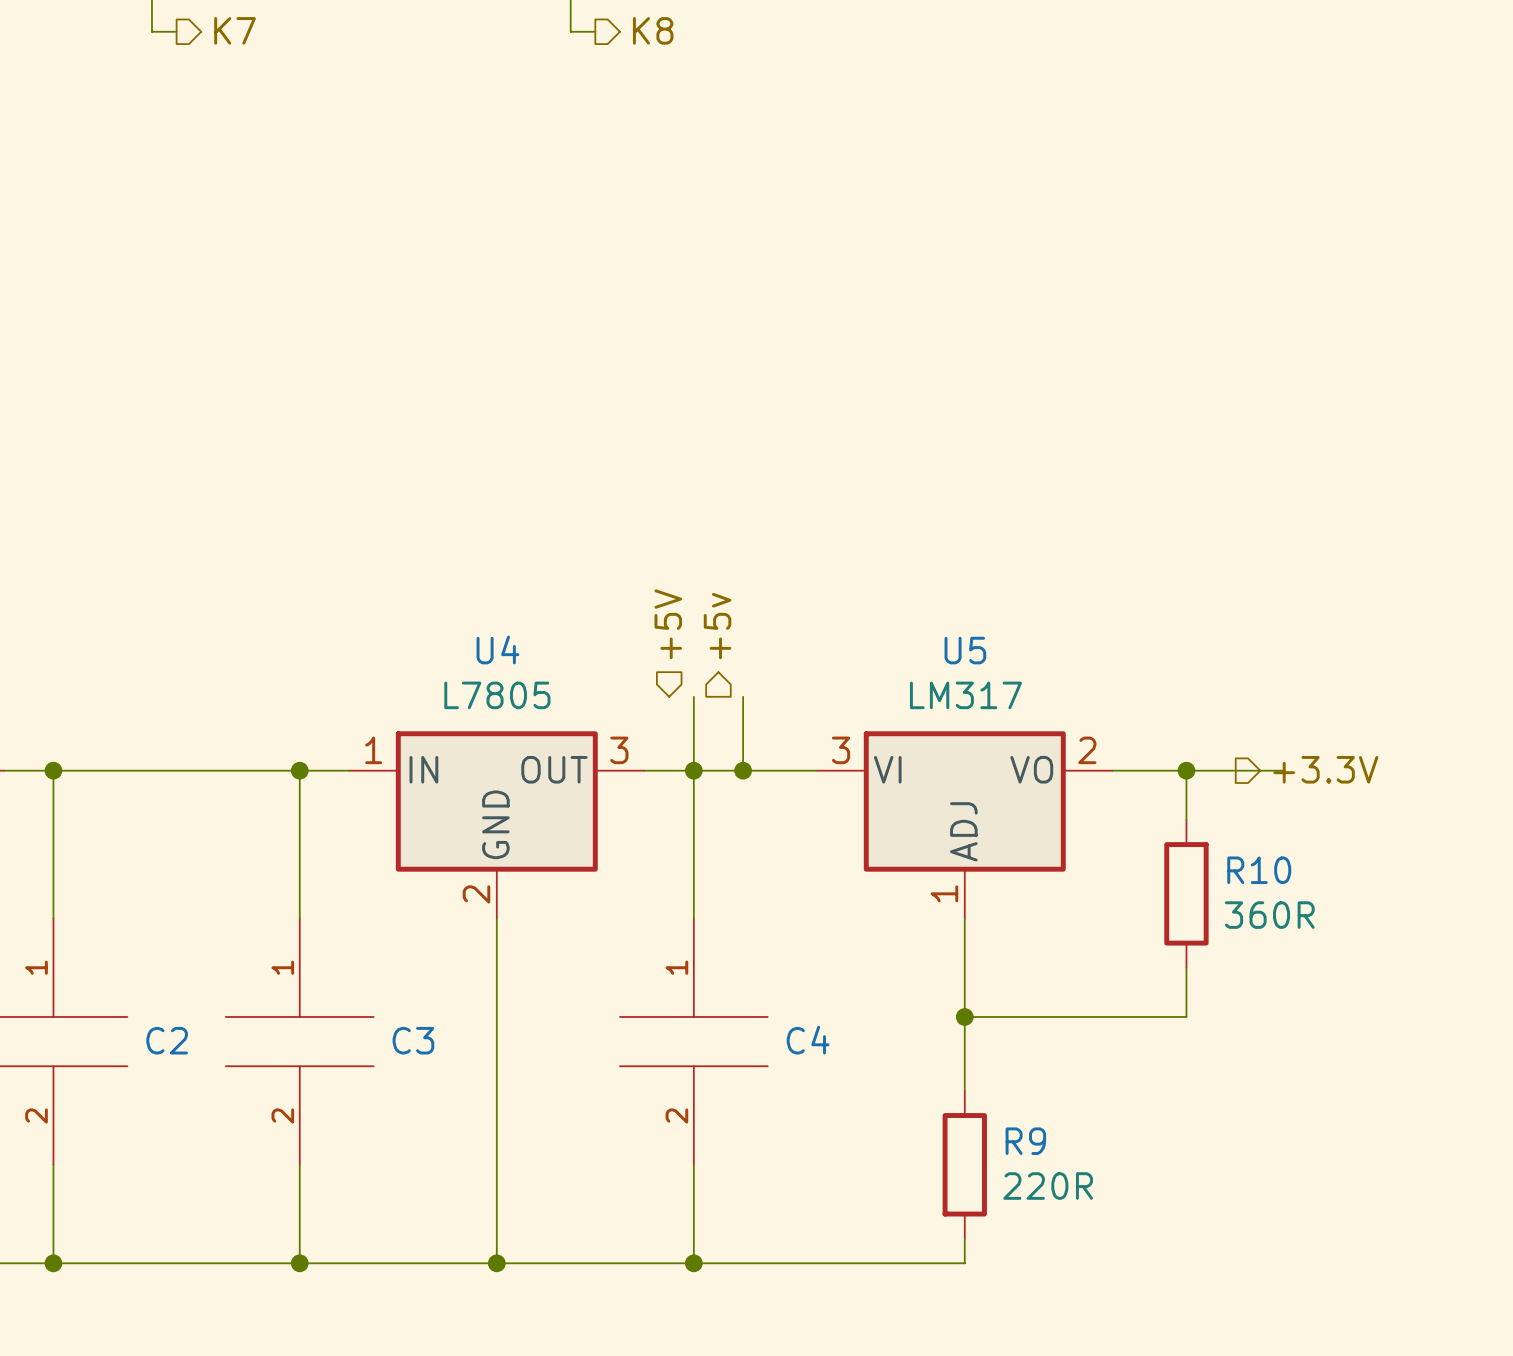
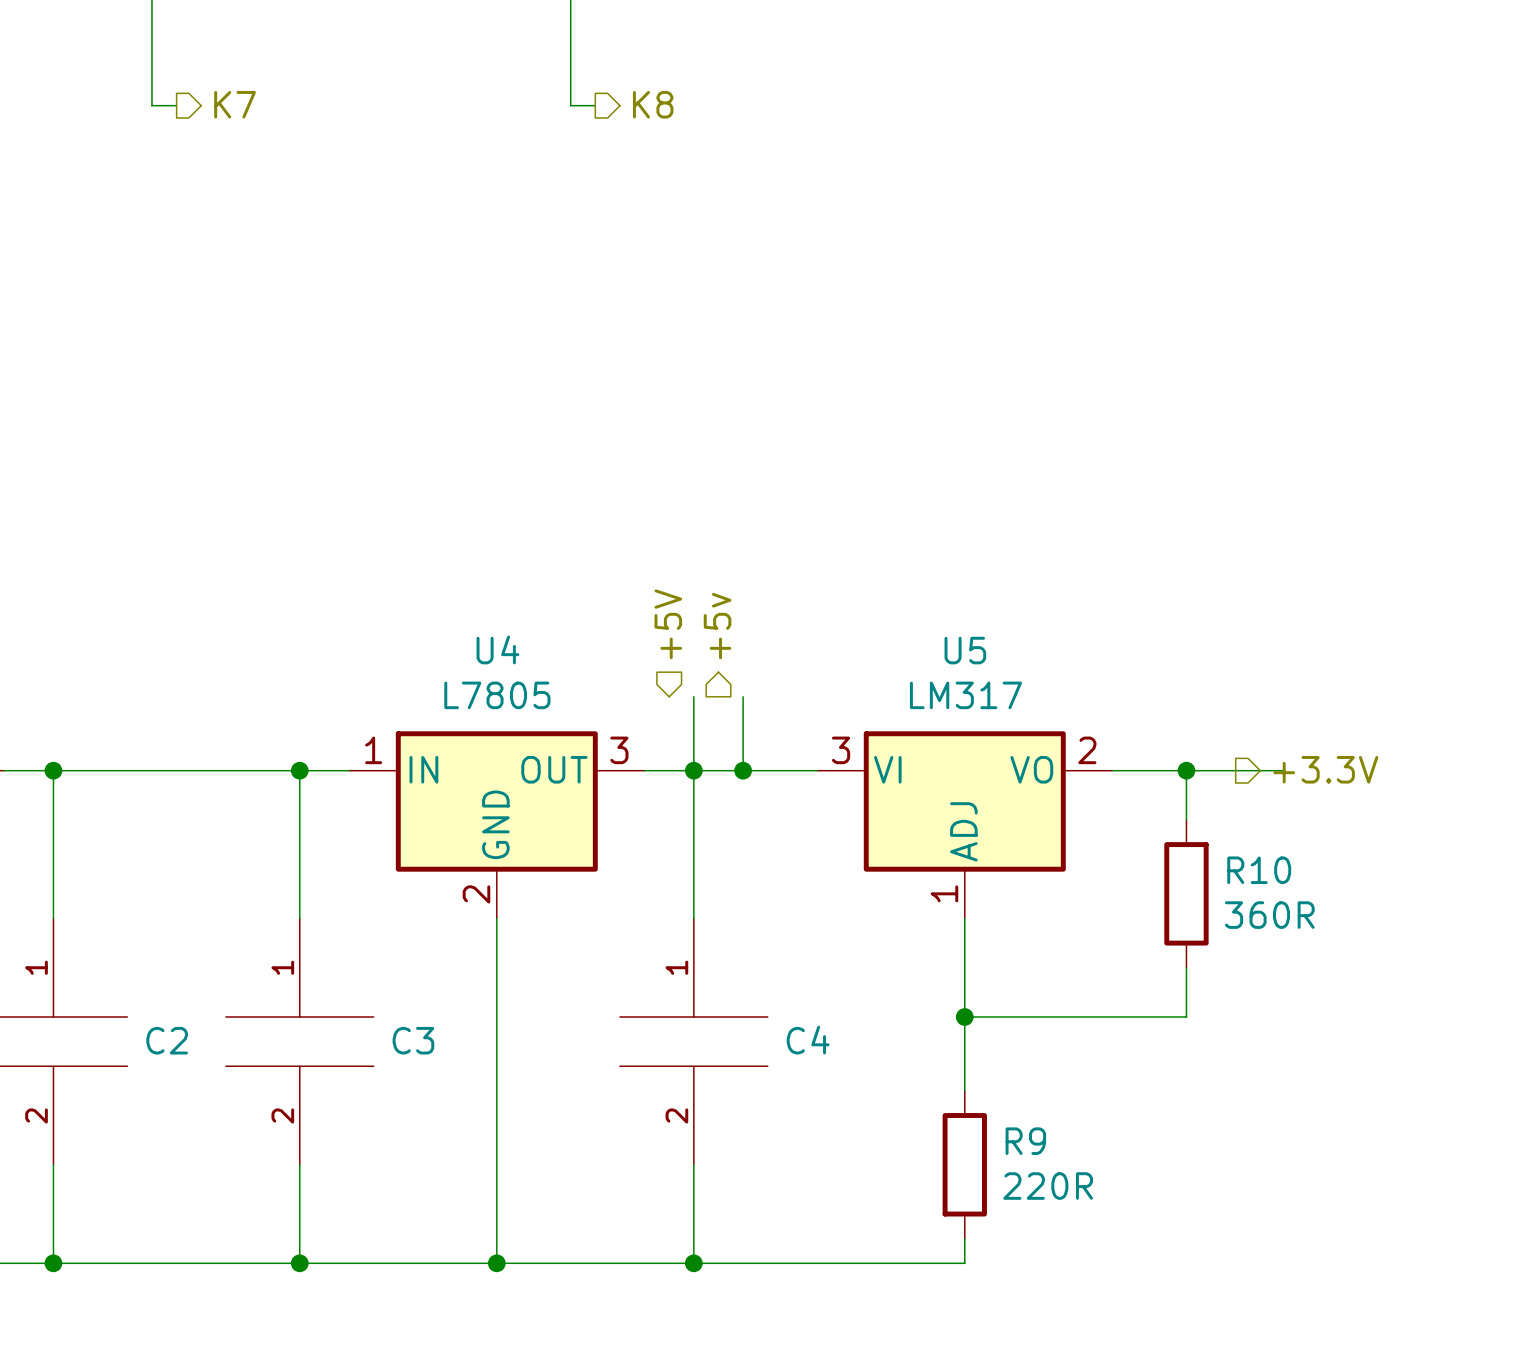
hierarchical label position: K7 (235, 30) -> K7 (235, 104)
hierarchical label position: K8 (653, 30) -> K8 (653, 104)
wire: (151, 31) (176, 31) -> (151, 31) (151, 105) (176, 105)
wire: (570, 31) (595, 31) -> (570, 31) (570, 105) (595, 105)

